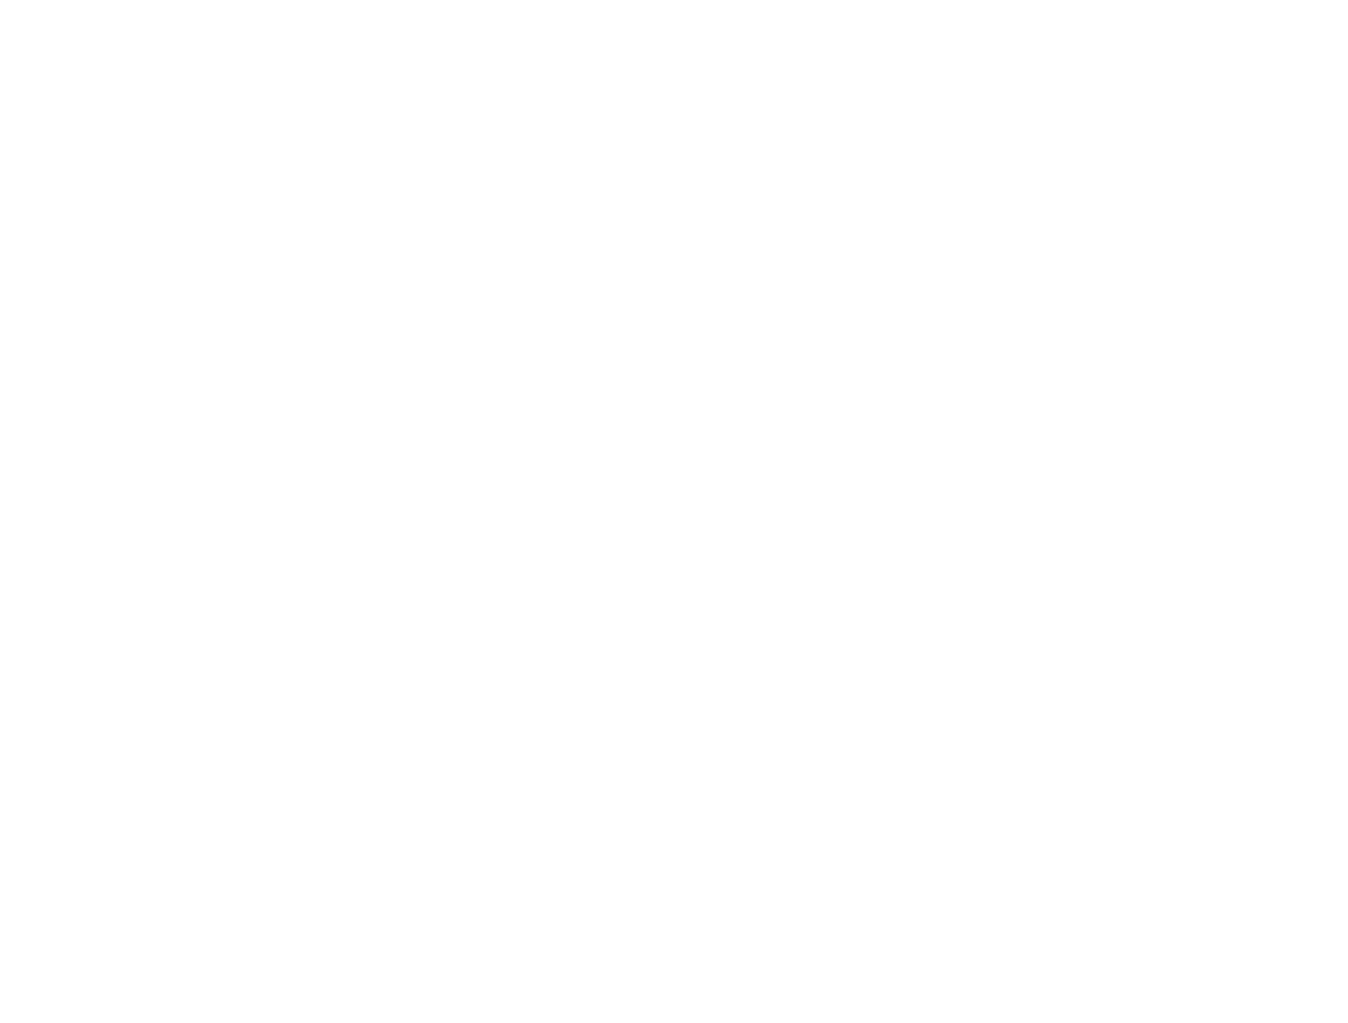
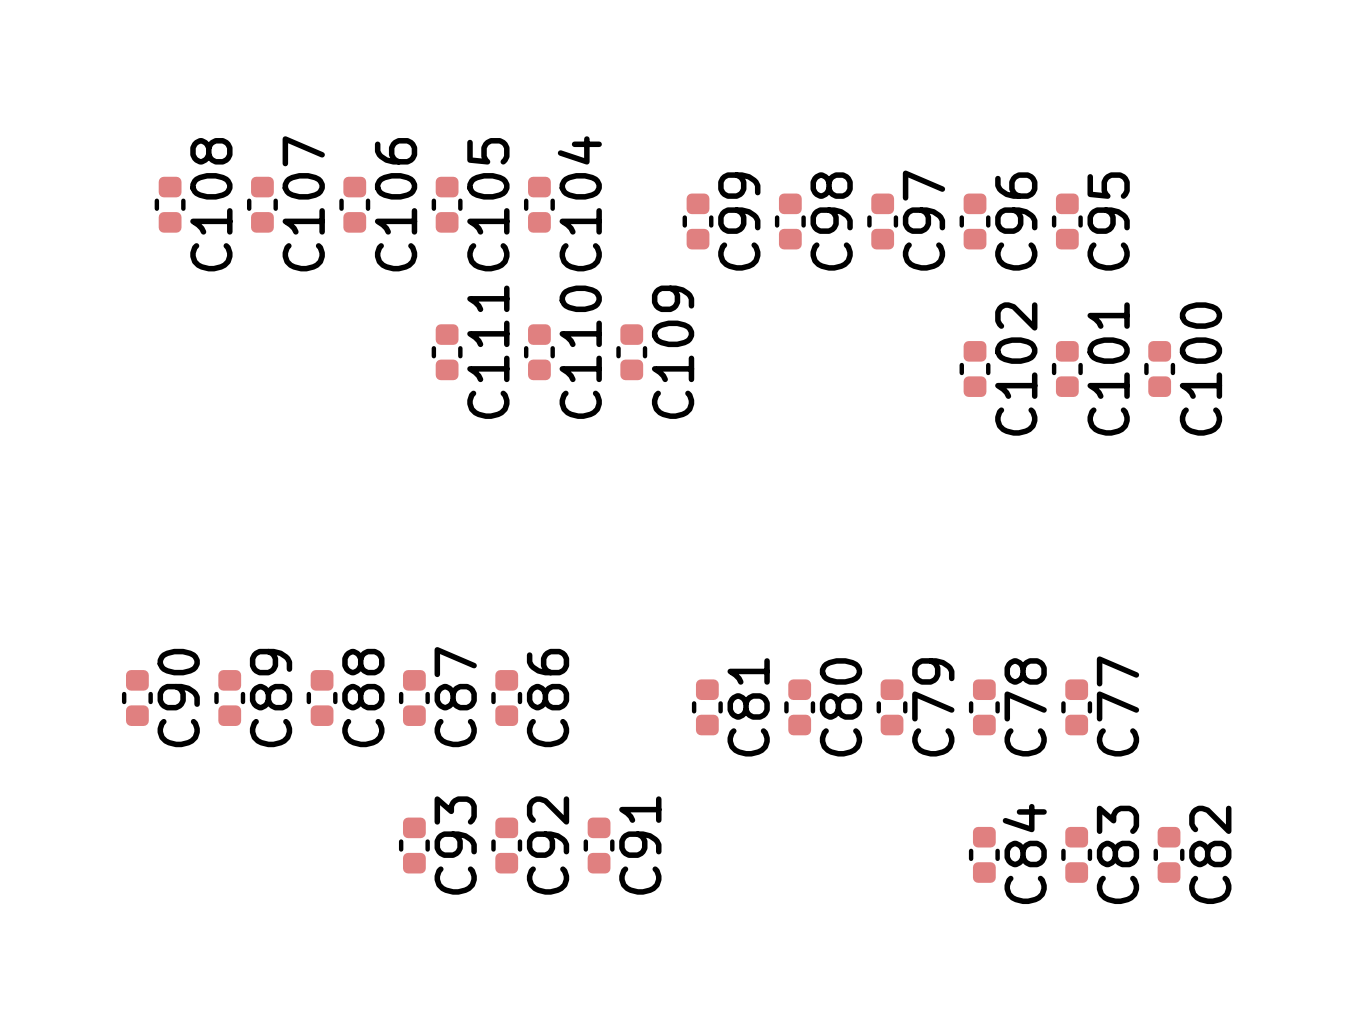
C108: none -> (170, 204)
C107: none -> (262, 204)
C106: none -> (354, 204)
C105: none -> (447, 204)
C104: none -> (539, 204)
C99: none -> (698, 221)
C98: none -> (790, 221)
C97: none -> (882, 221)
C96: none -> (975, 221)
C95: none -> (1067, 221)
C111: none -> (447, 352)
C110: none -> (539, 352)
C109: none -> (631, 352)
C102: none -> (975, 369)
C101: none -> (1067, 369)
C100: none -> (1159, 369)
C90: none -> (137, 698)
C89: none -> (229, 698)
C88: none -> (322, 698)
C87: none -> (414, 698)
C86: none -> (506, 698)
C81: none -> (707, 707)
C80: none -> (799, 707)
C79: none -> (892, 707)
C78: none -> (984, 707)
C77: none -> (1076, 707)
C93: none -> (414, 845)
C92: none -> (506, 845)
C91: none -> (599, 845)
C84: none -> (984, 854)
C83: none -> (1076, 854)
C82: none -> (1169, 854)

